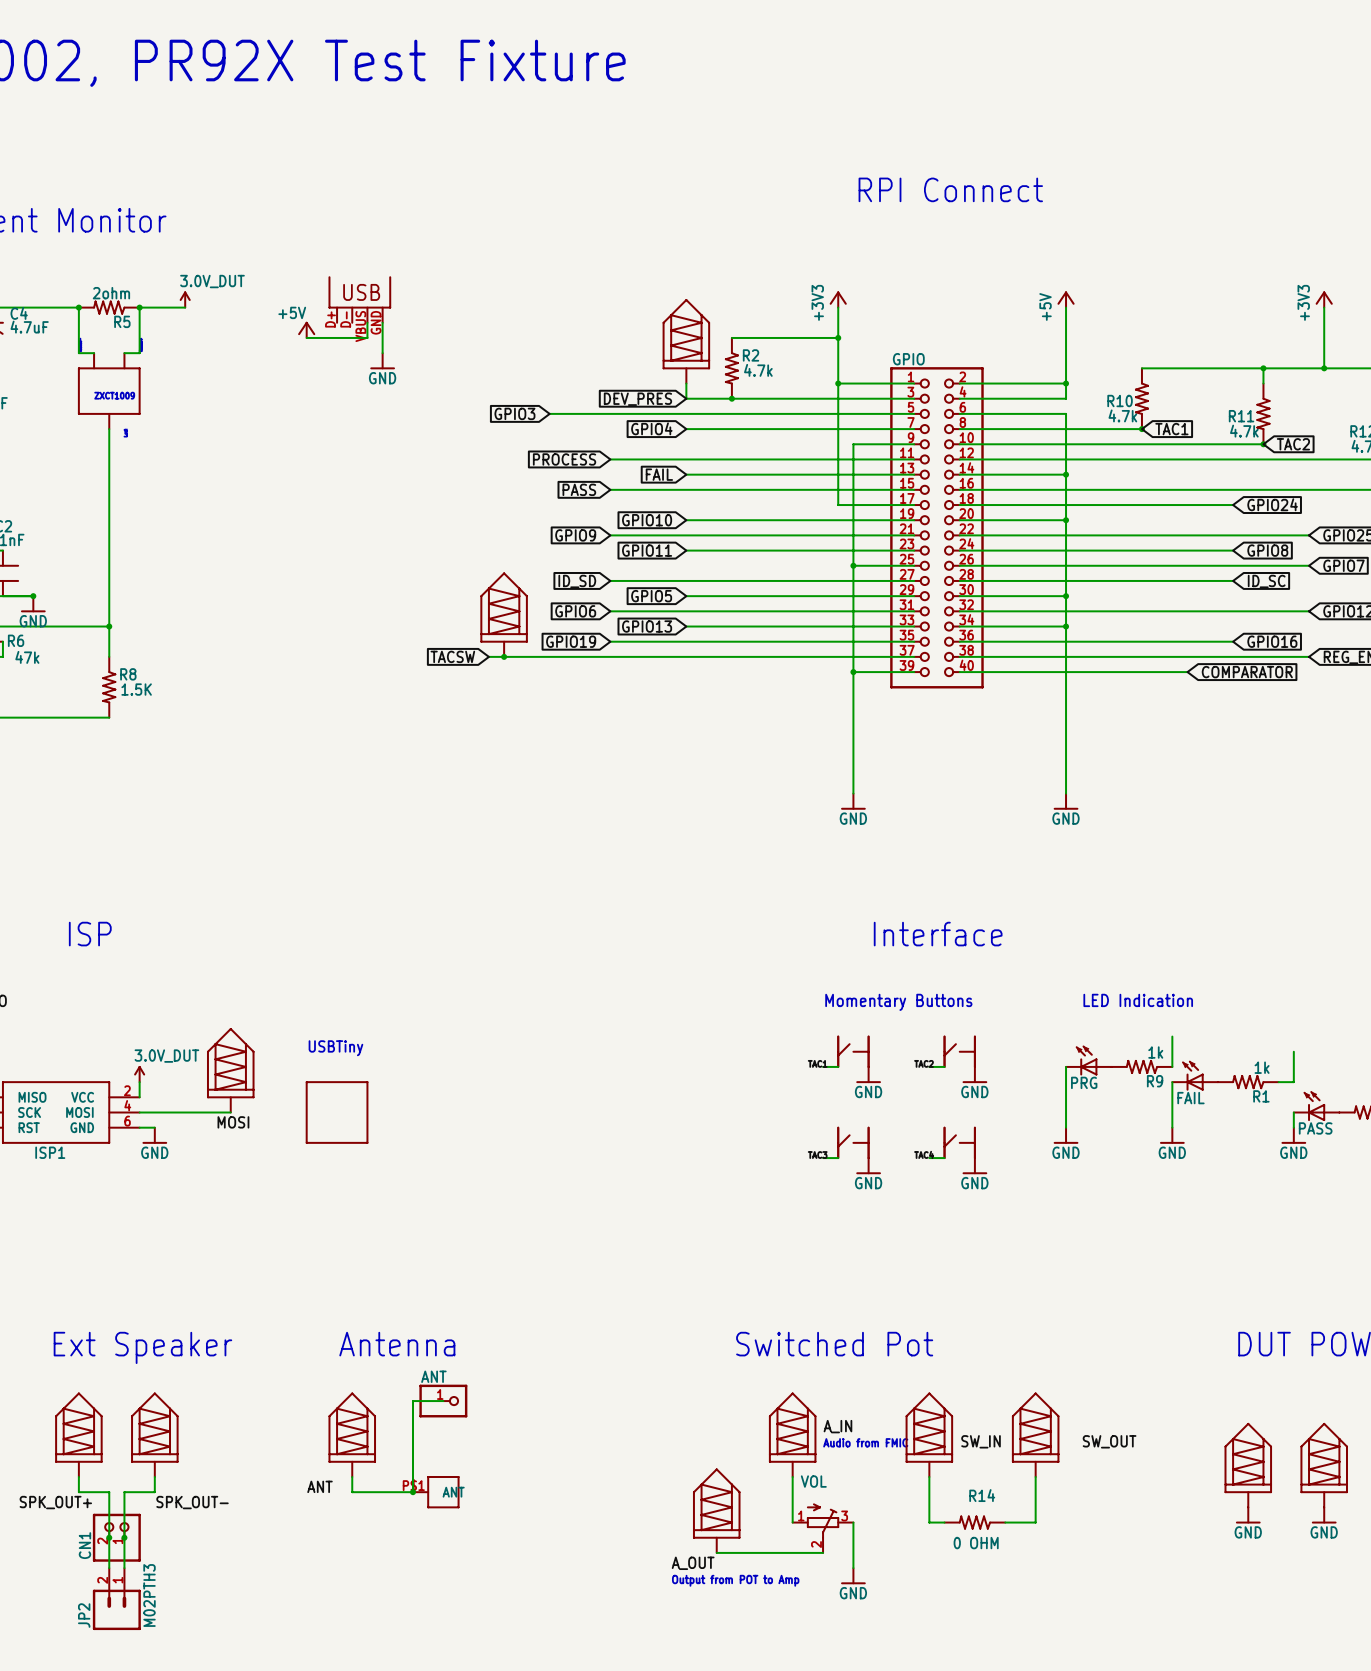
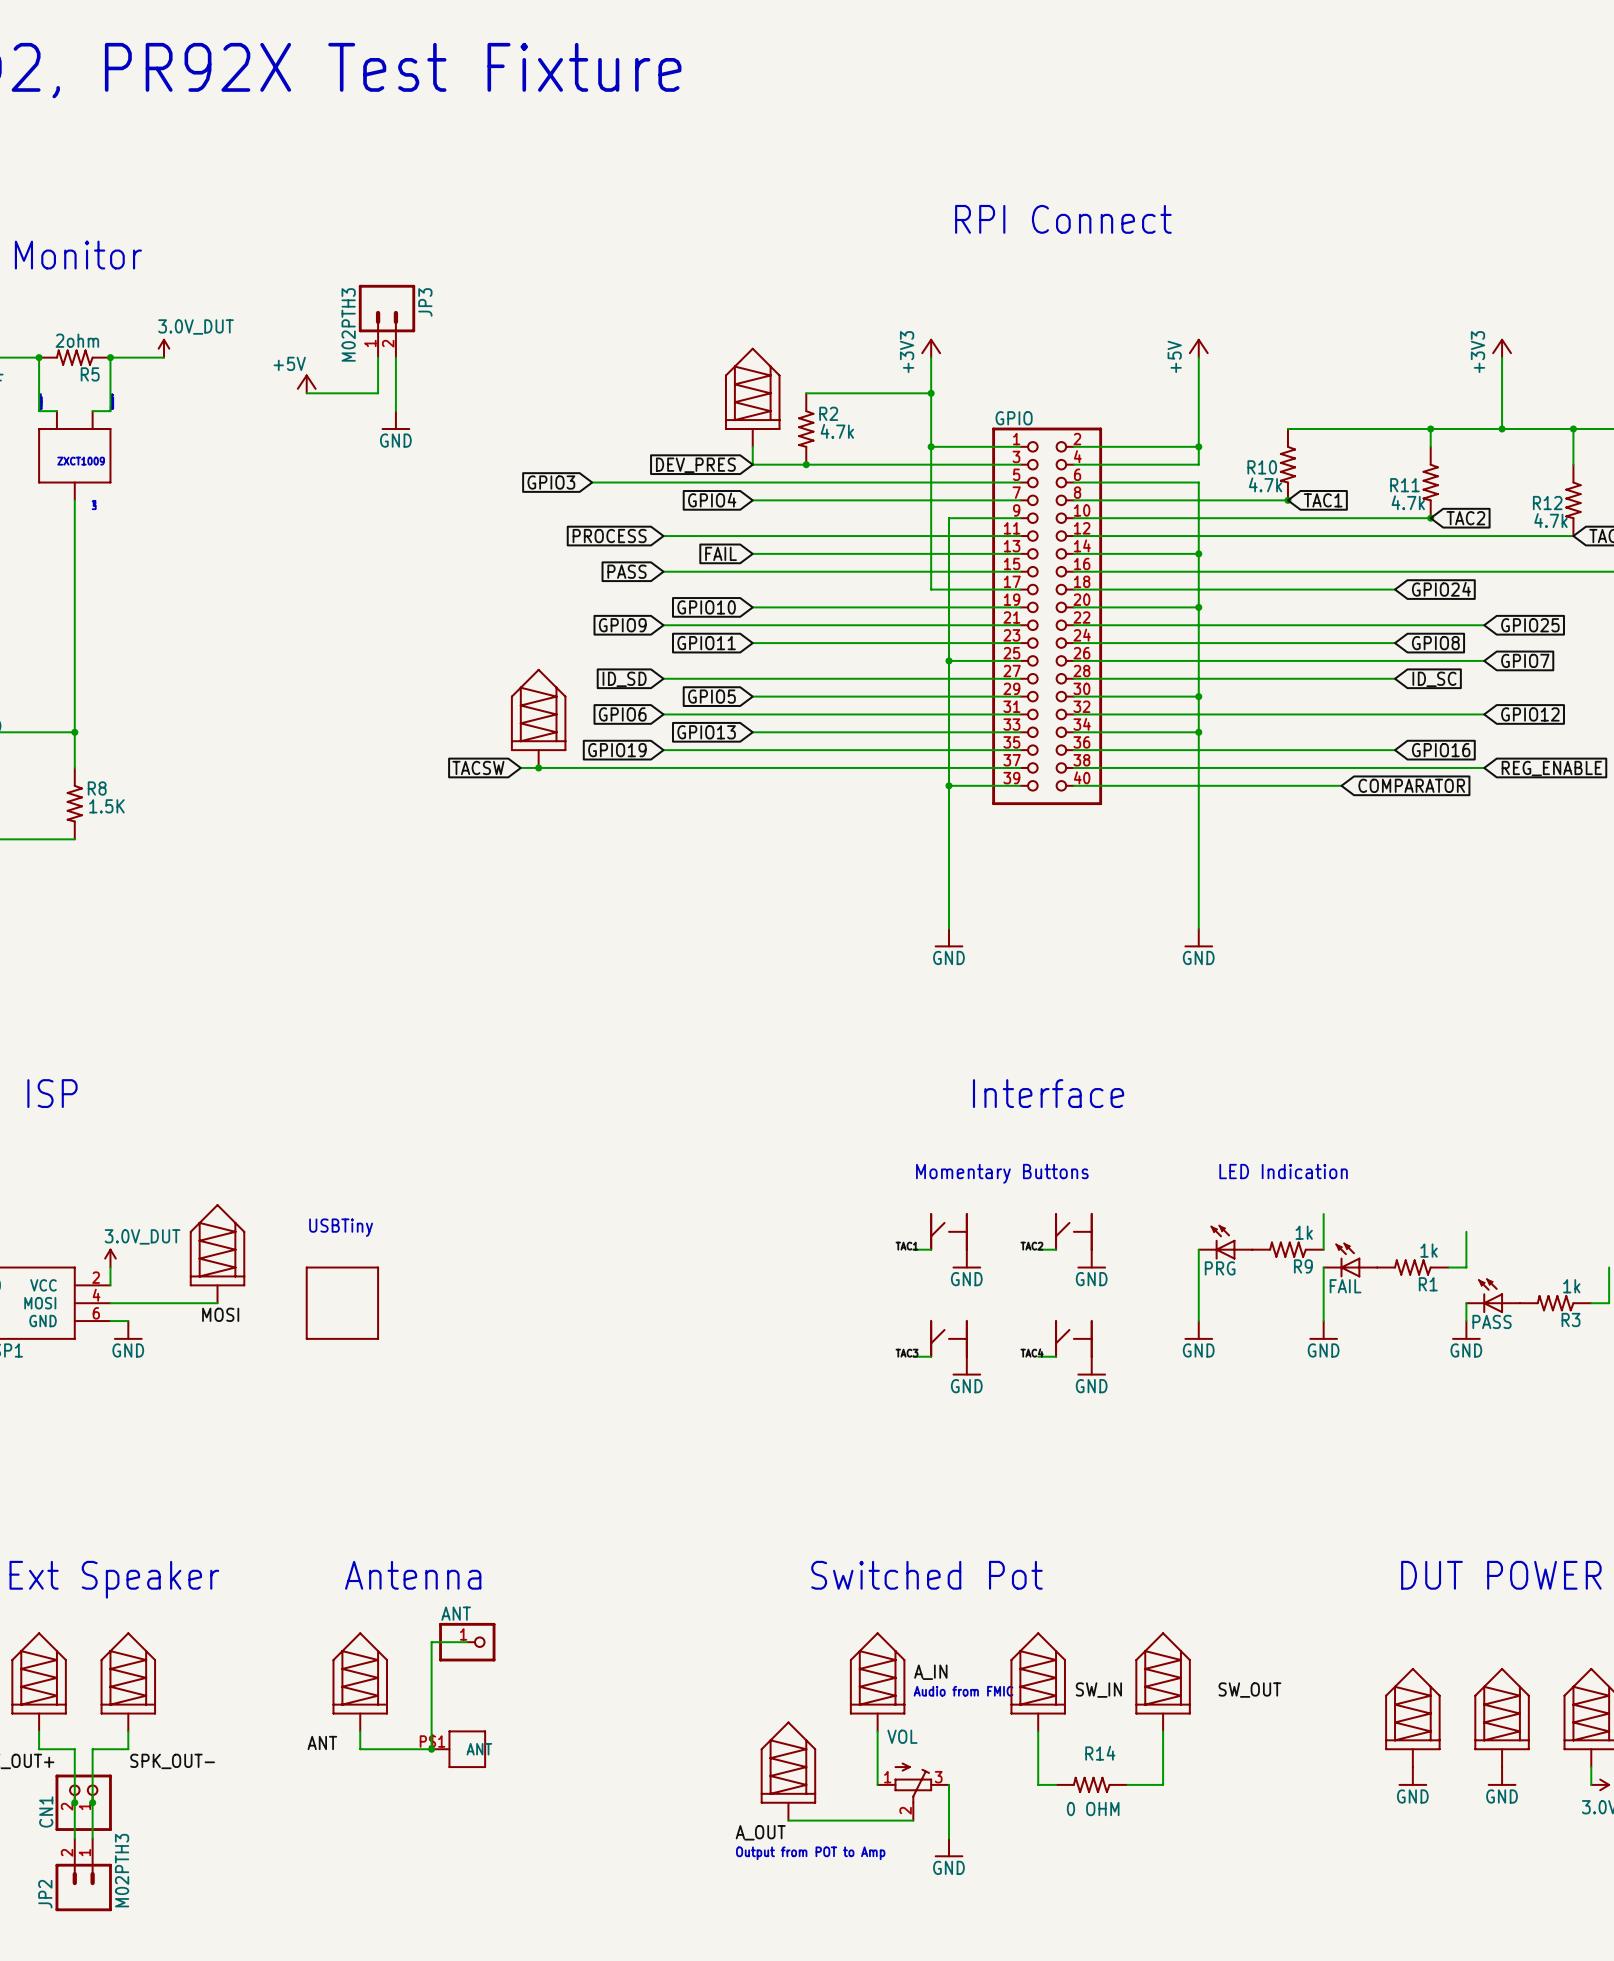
JP3: none -> M02PTH3 (387, 321)
part: (359, 299) -> none

